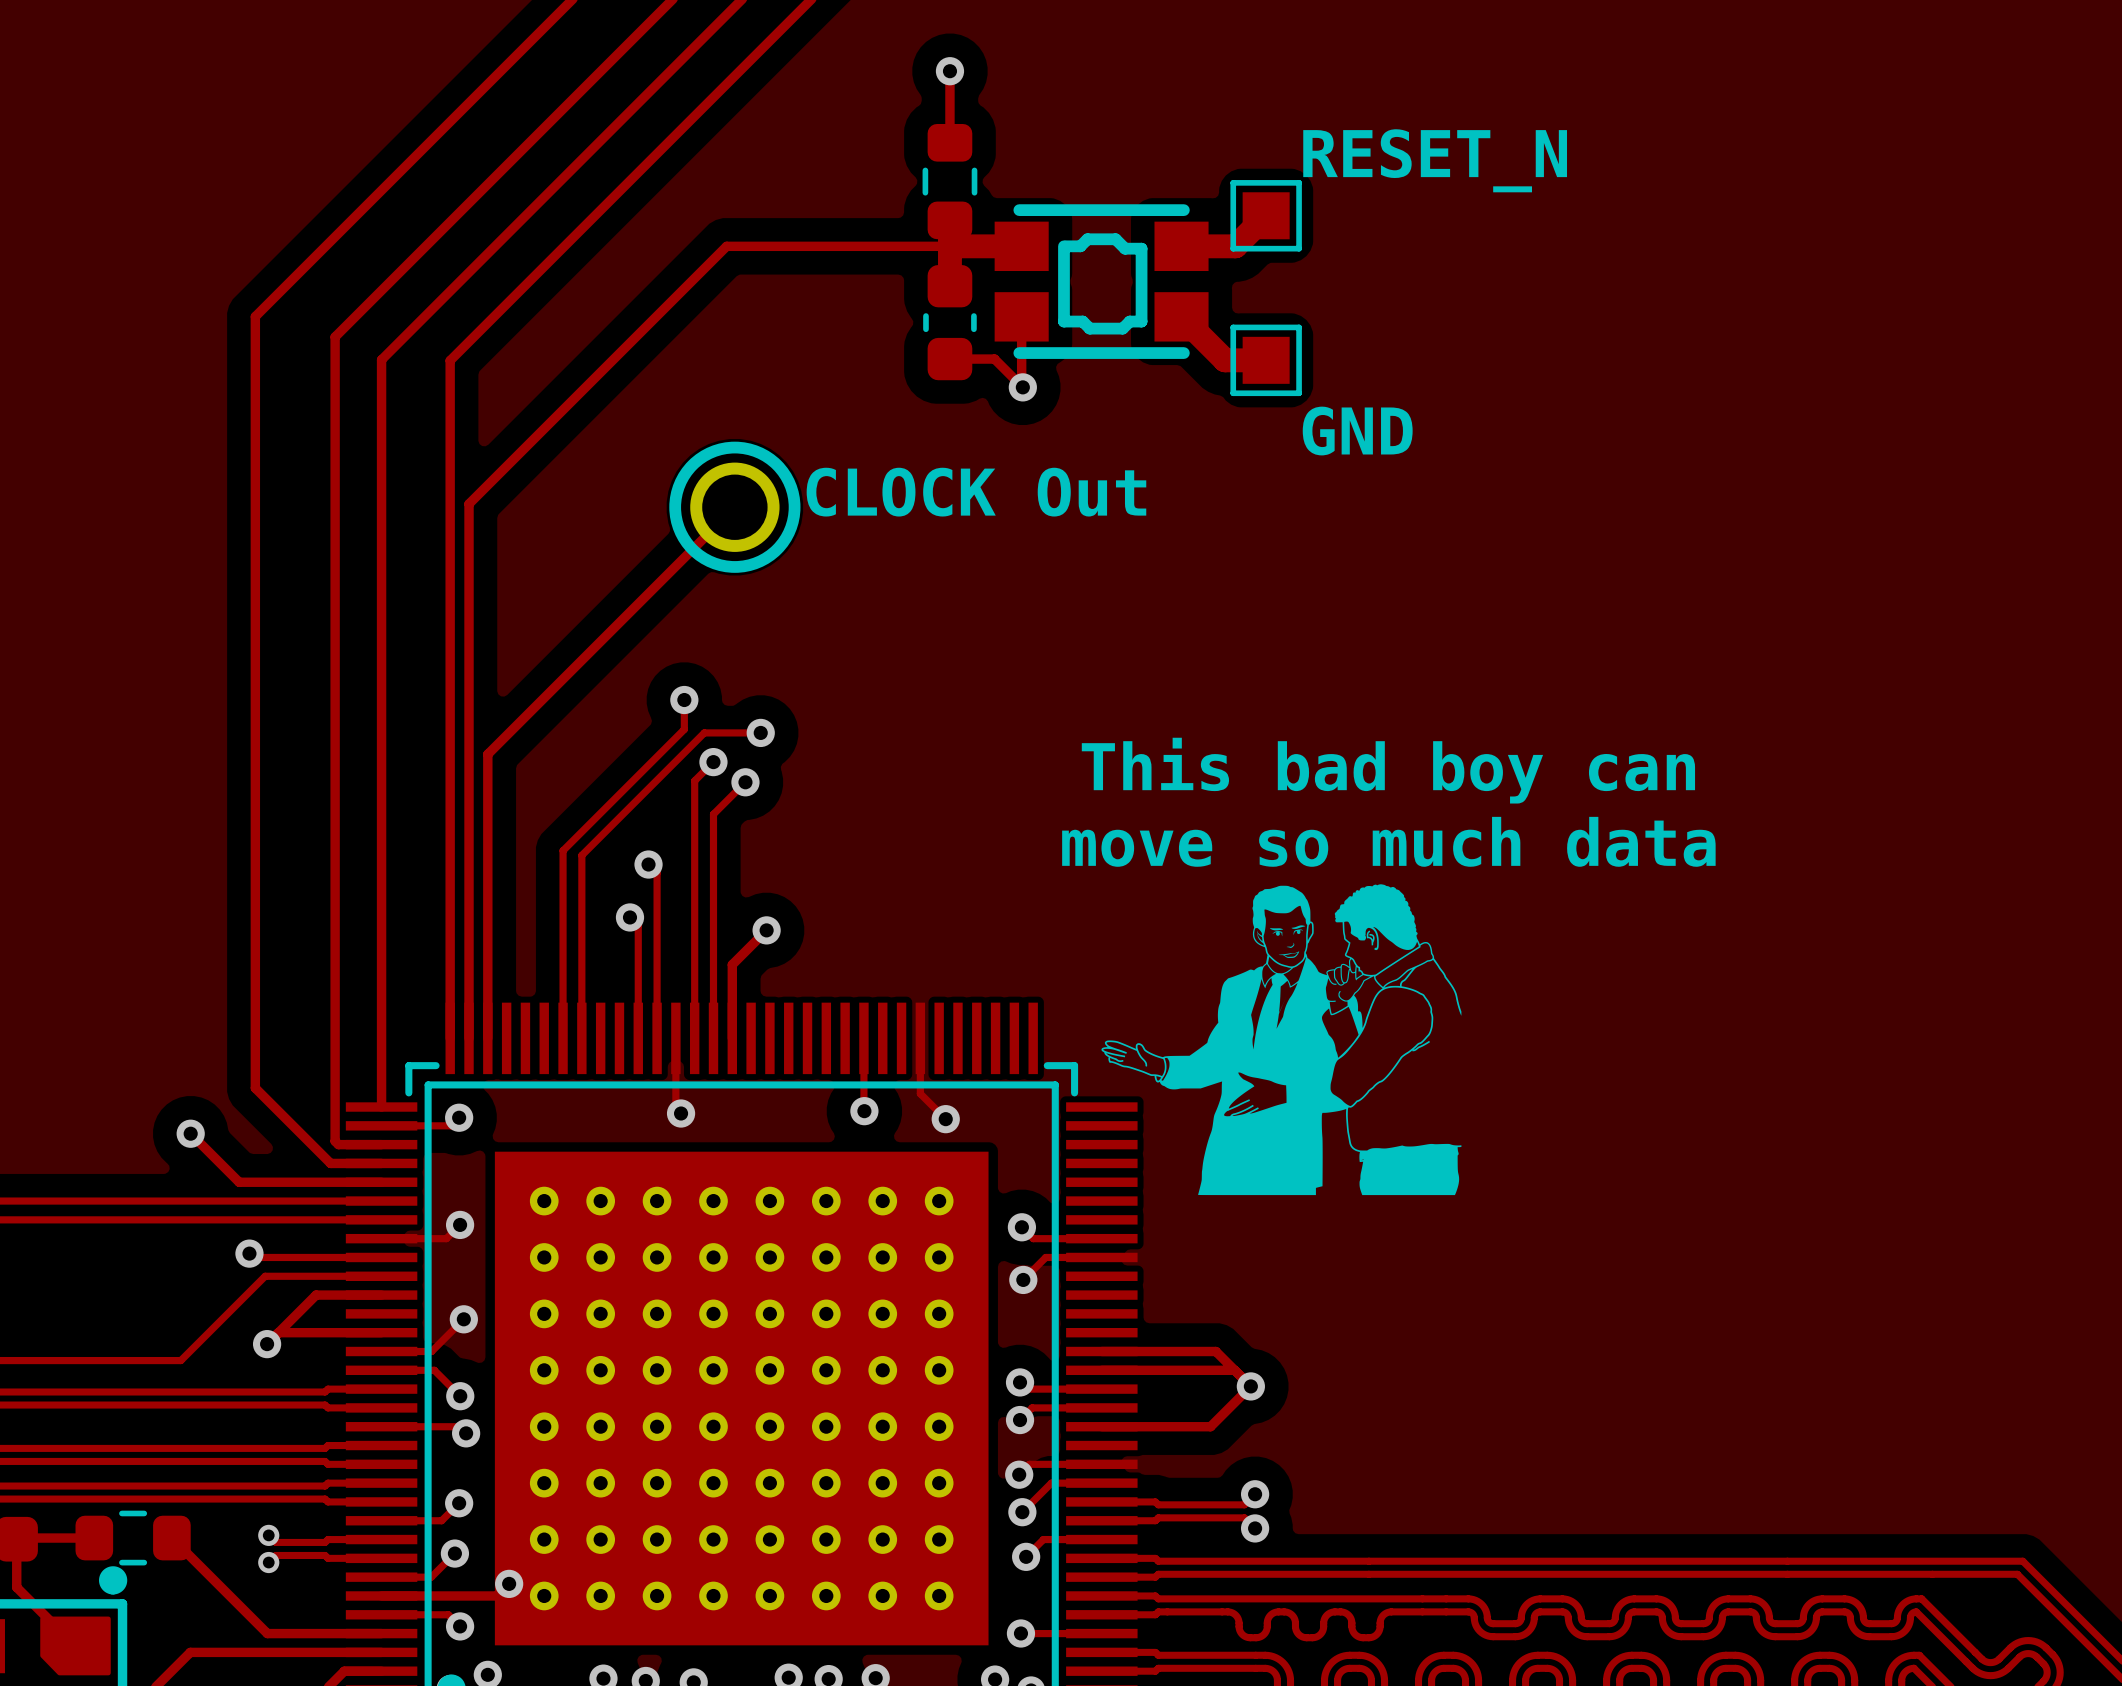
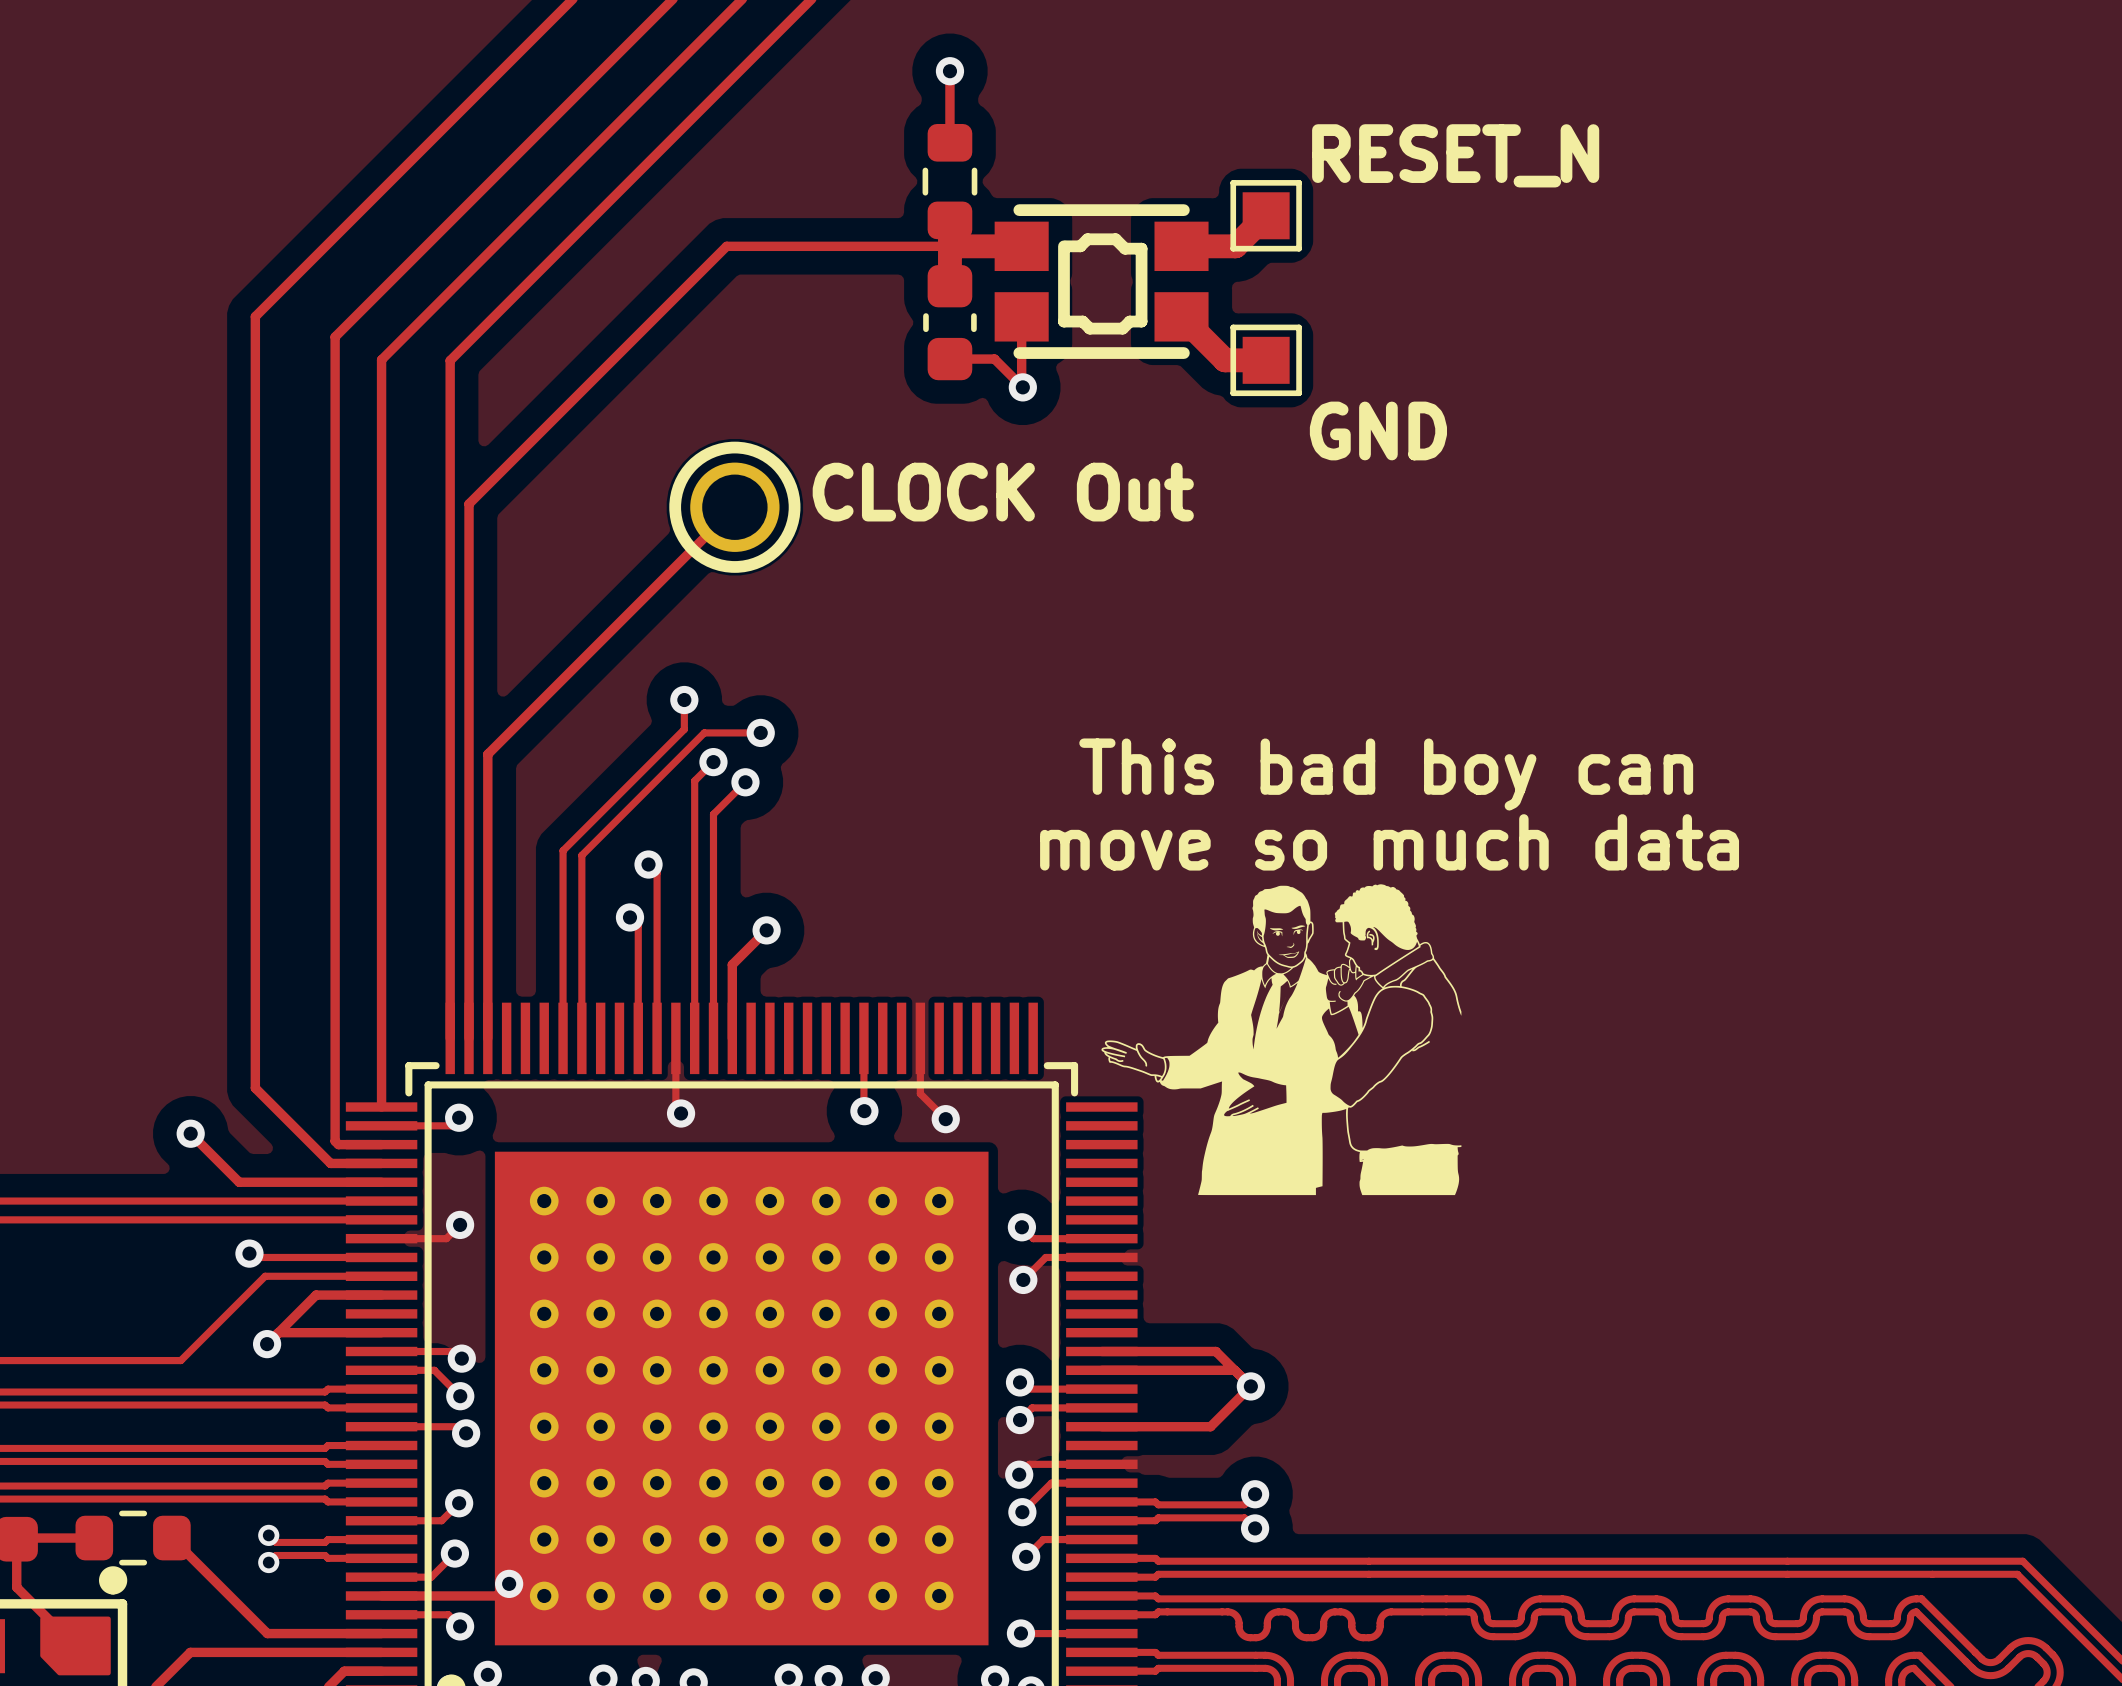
track: (463, 1319) (431, 1351) -> (461, 1358) (454, 1351) (431, 1351)
via position: (463, 1319) -> (461, 1358)

